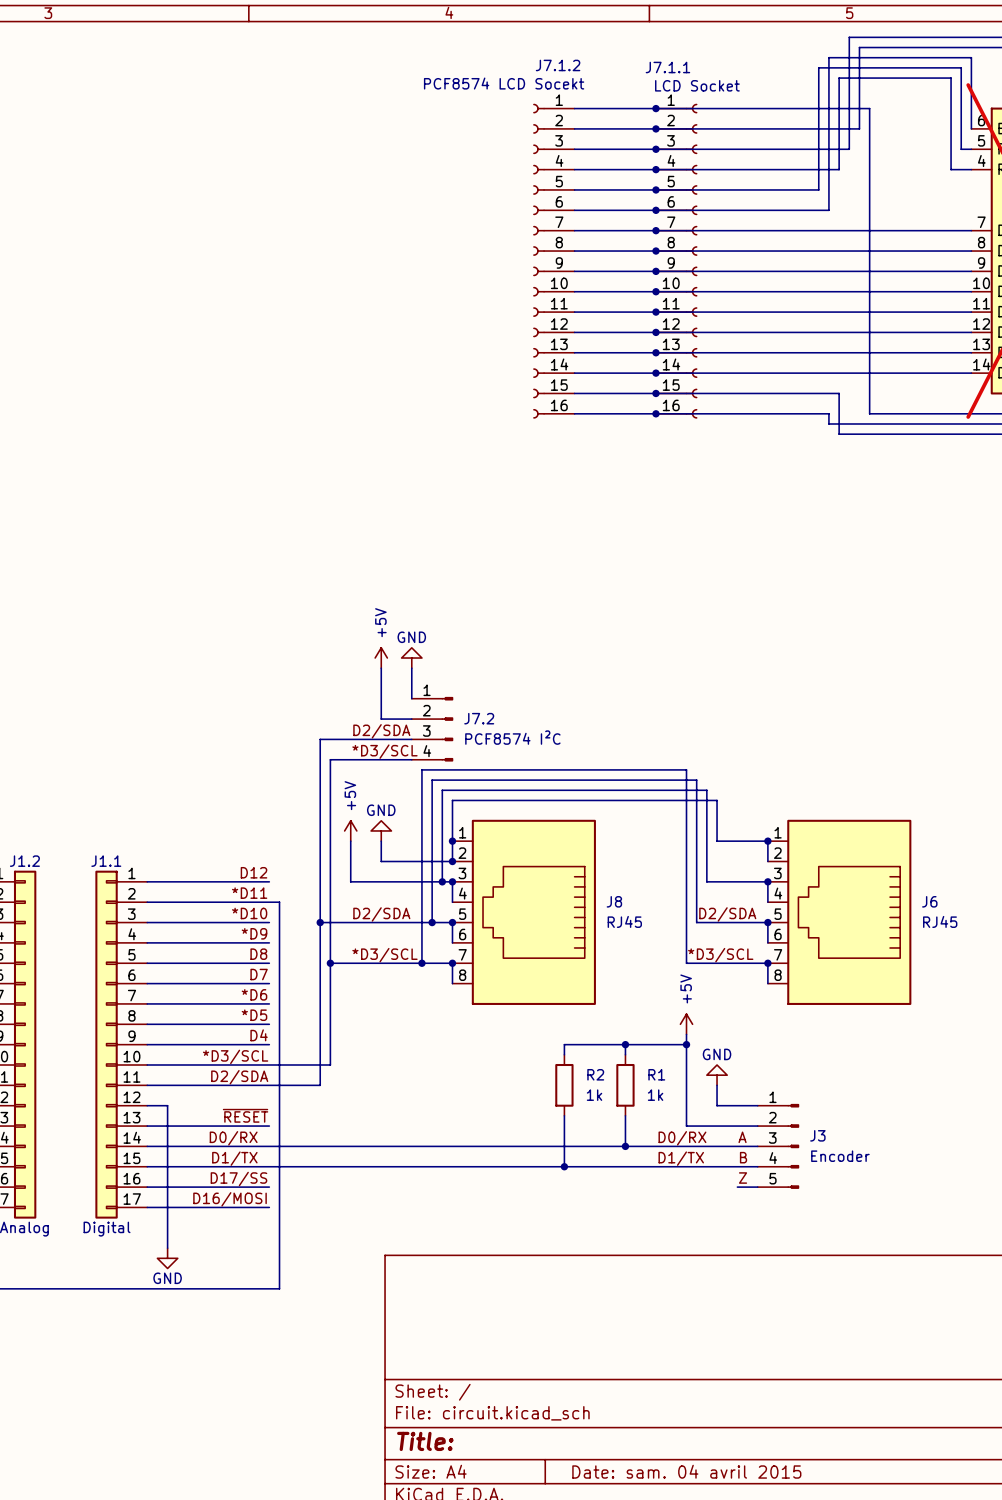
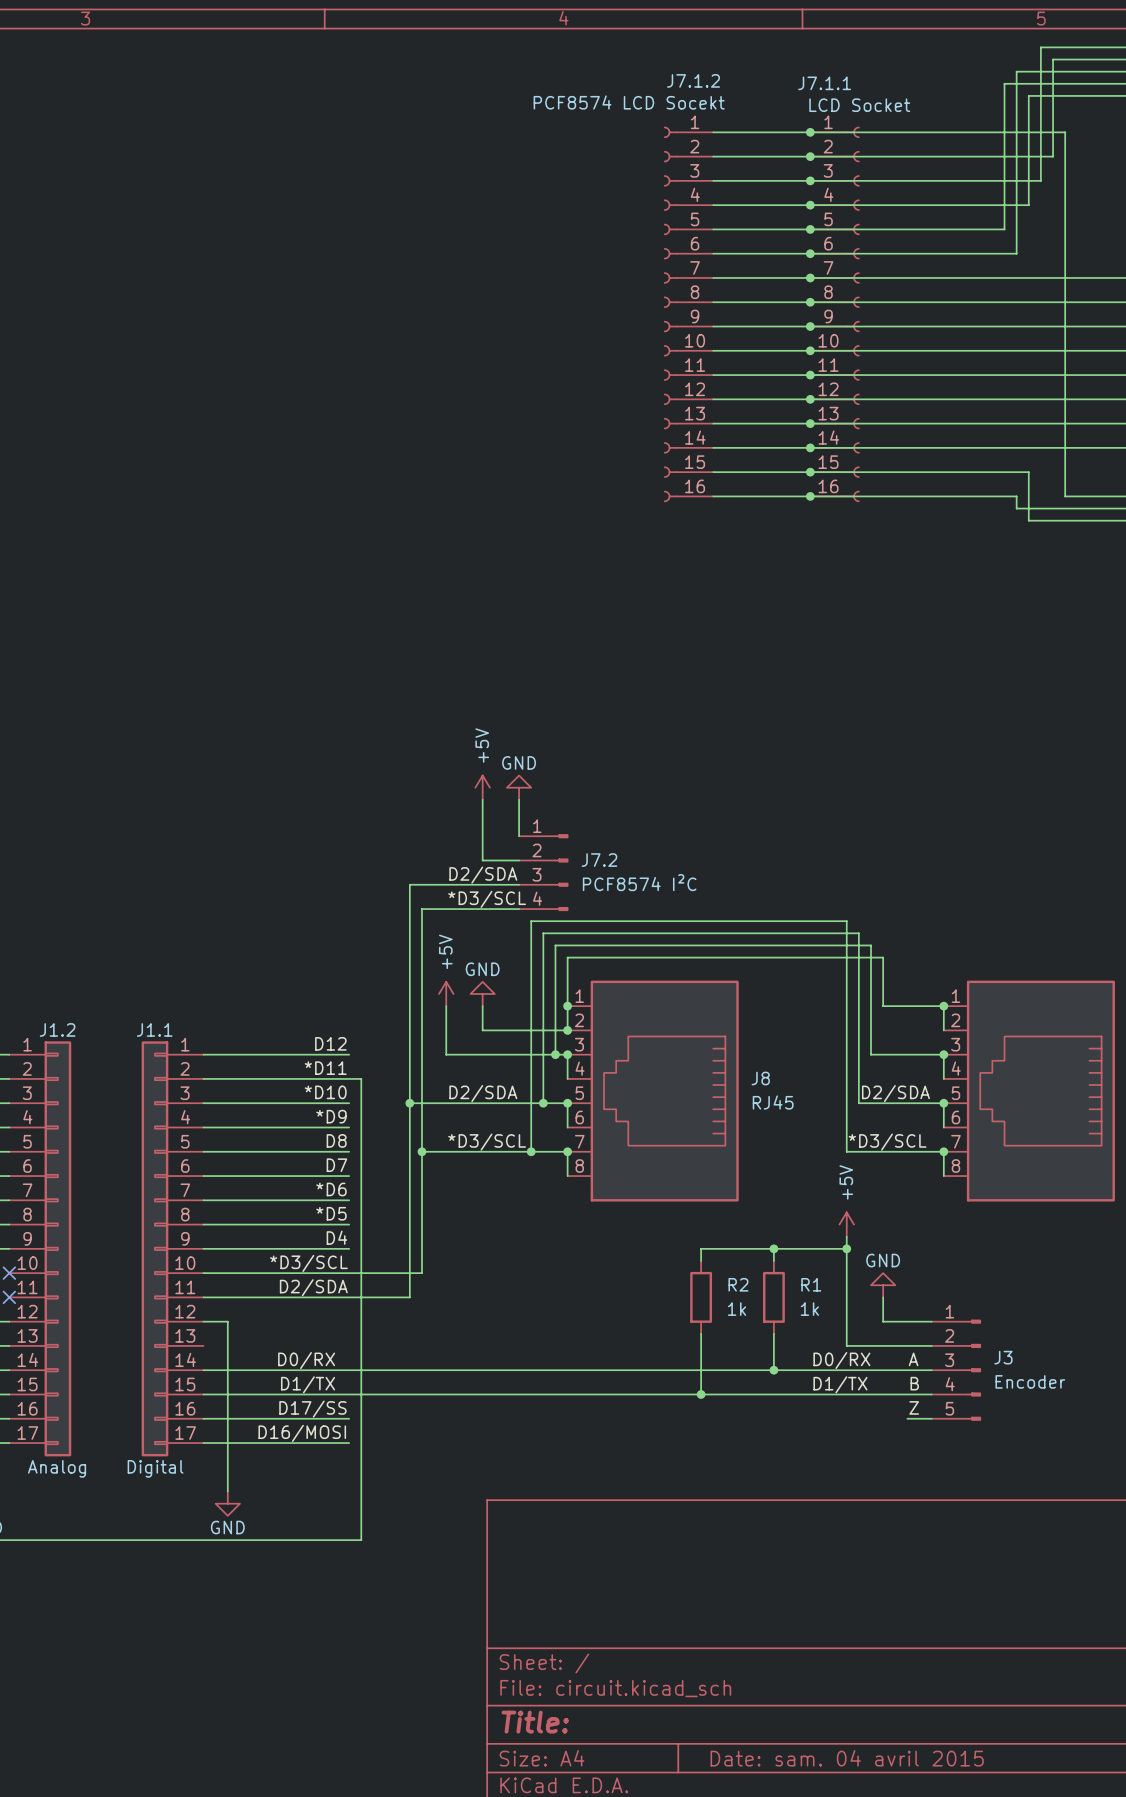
label: ~{RESET} (245, 1115) -> none
wire: (147, 1126) (269, 1126) -> none

